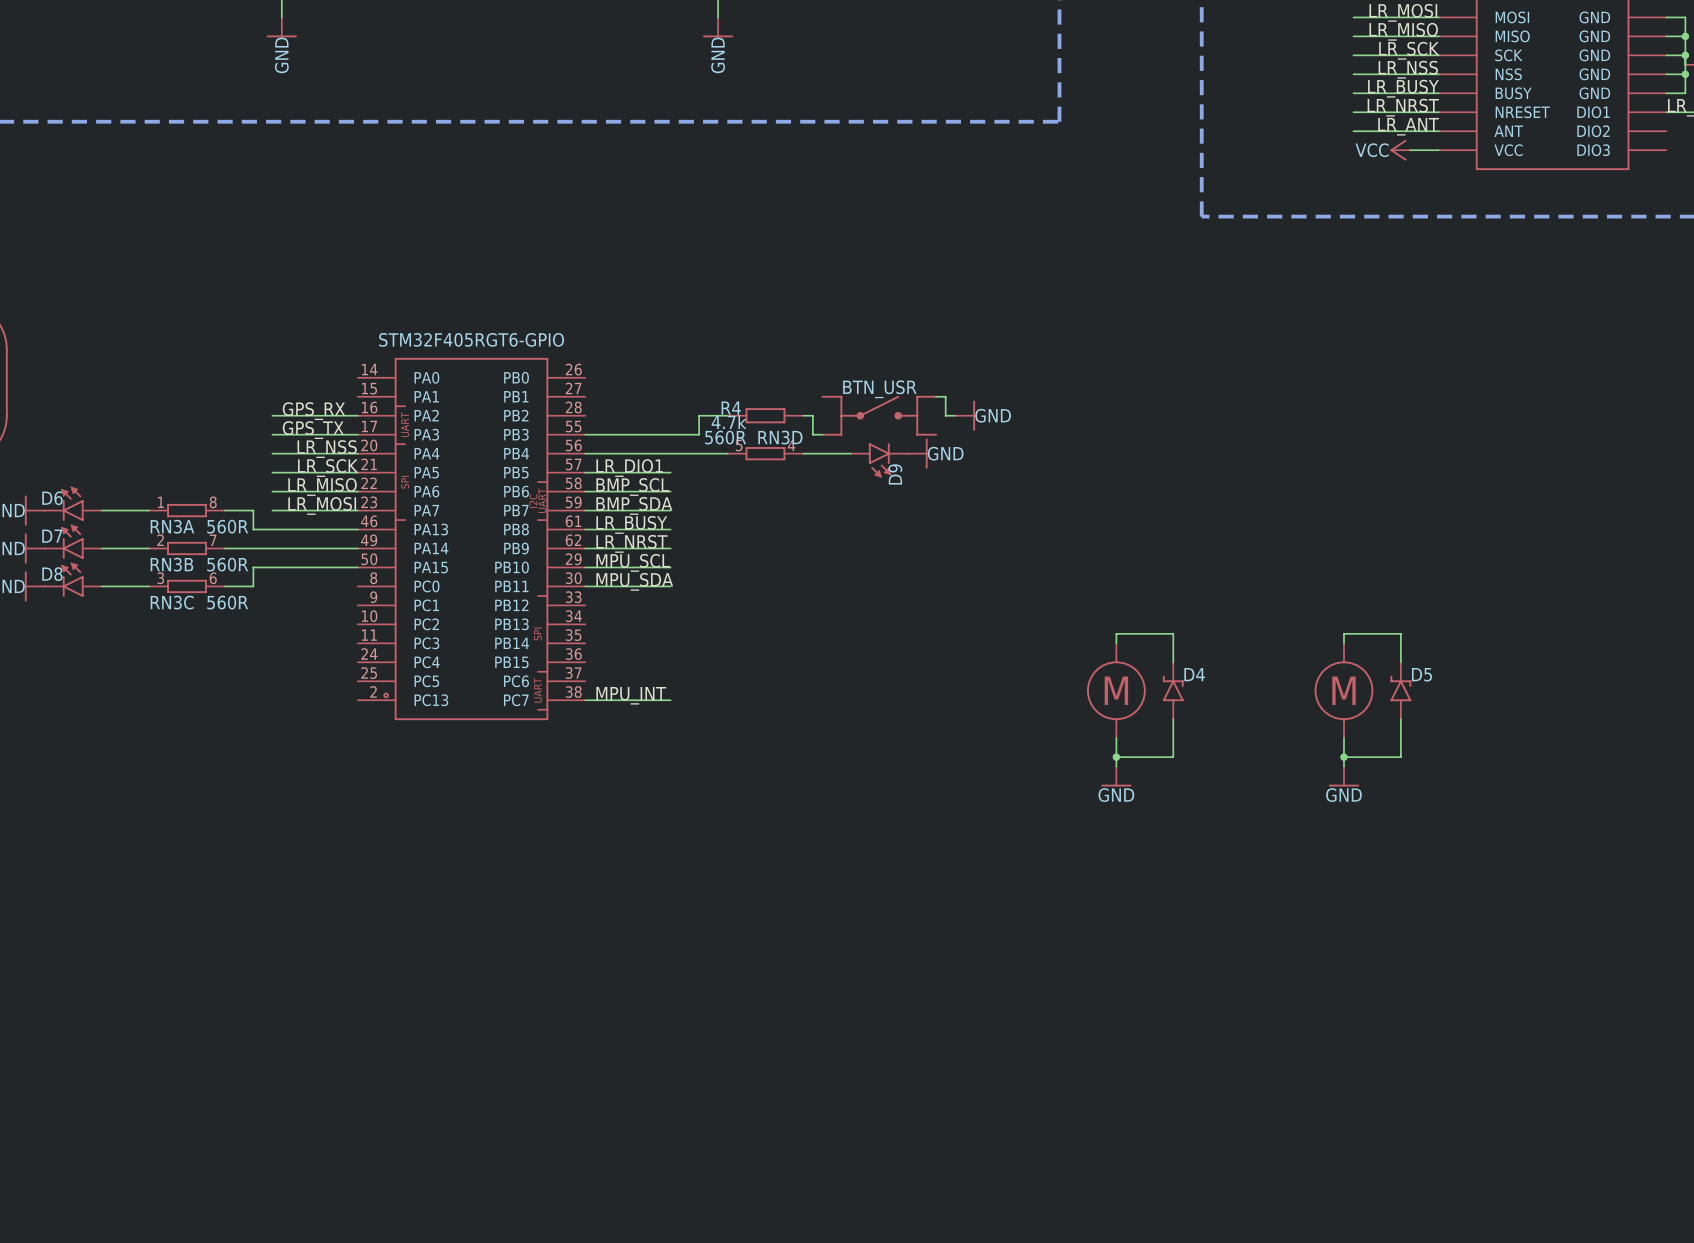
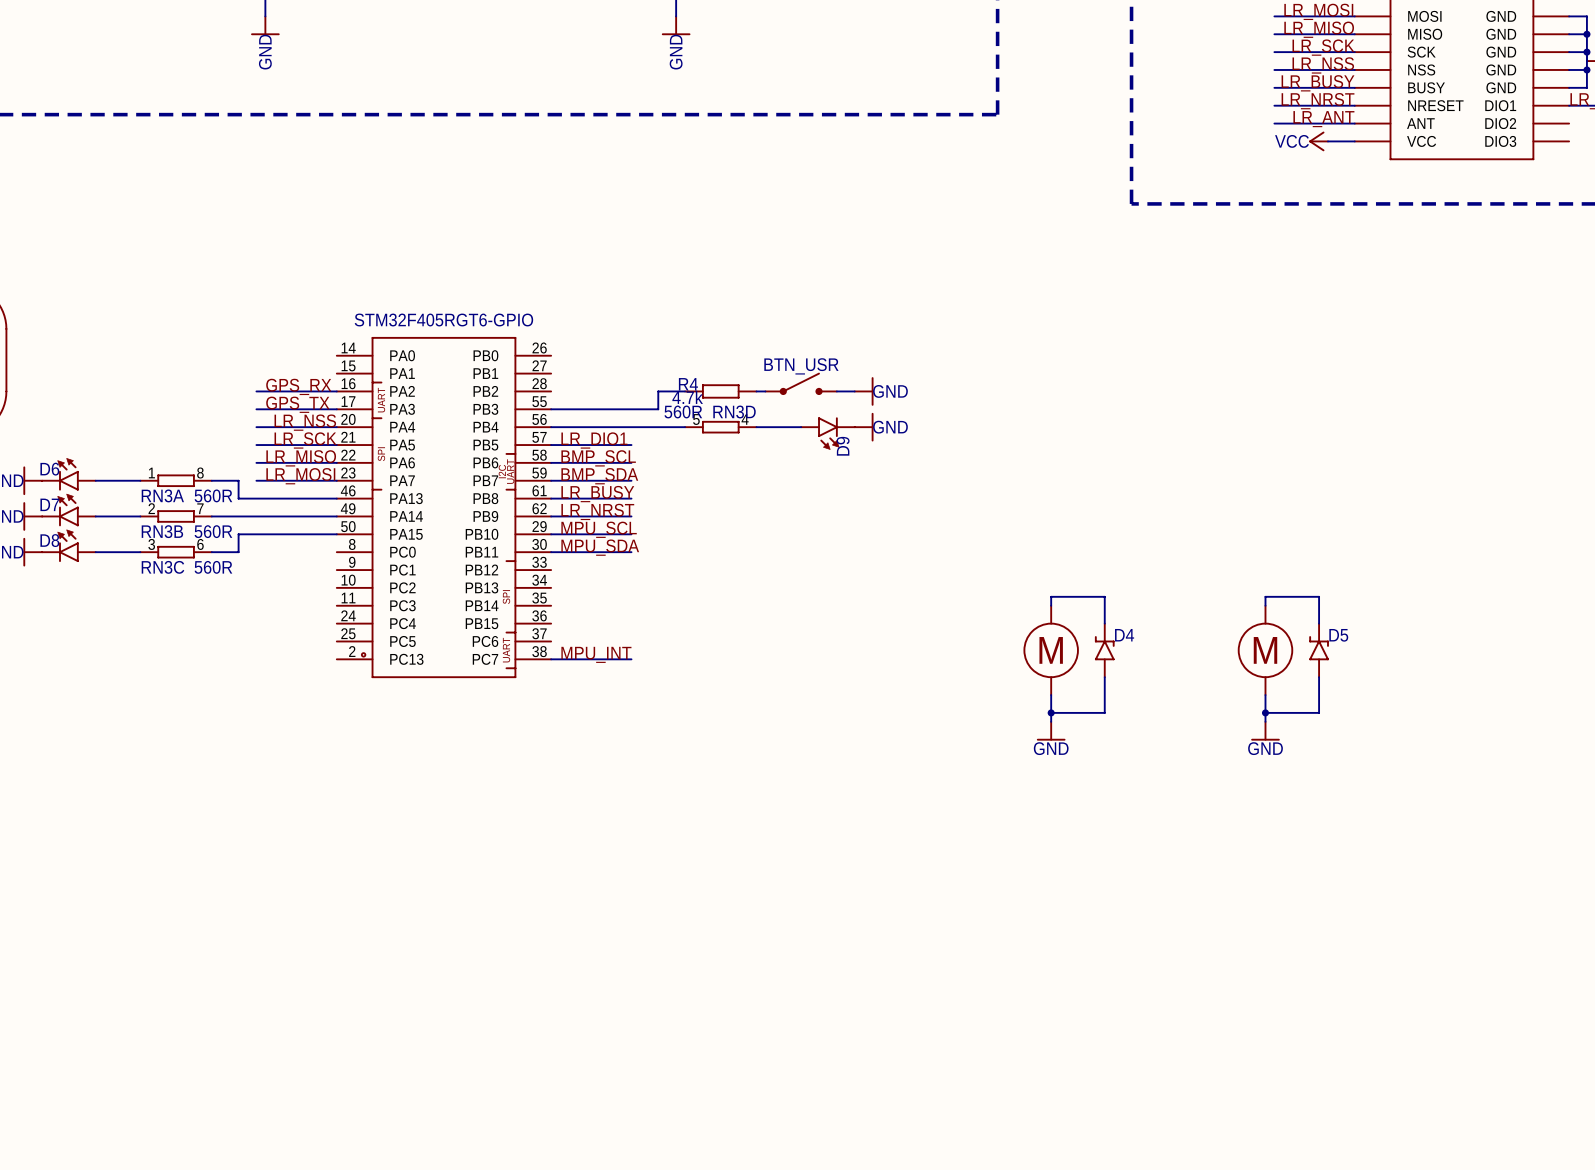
wire: (936, 396) (945, 396) (945, 415) (955, 415) -> none
BTN_USR: none -> (801, 383)
wire: (812, 415) (812, 434) (822, 434) -> none
BTN_USR: (879, 415) -> none
power symbol position: GND (965, 415) -> GND (864, 391)

